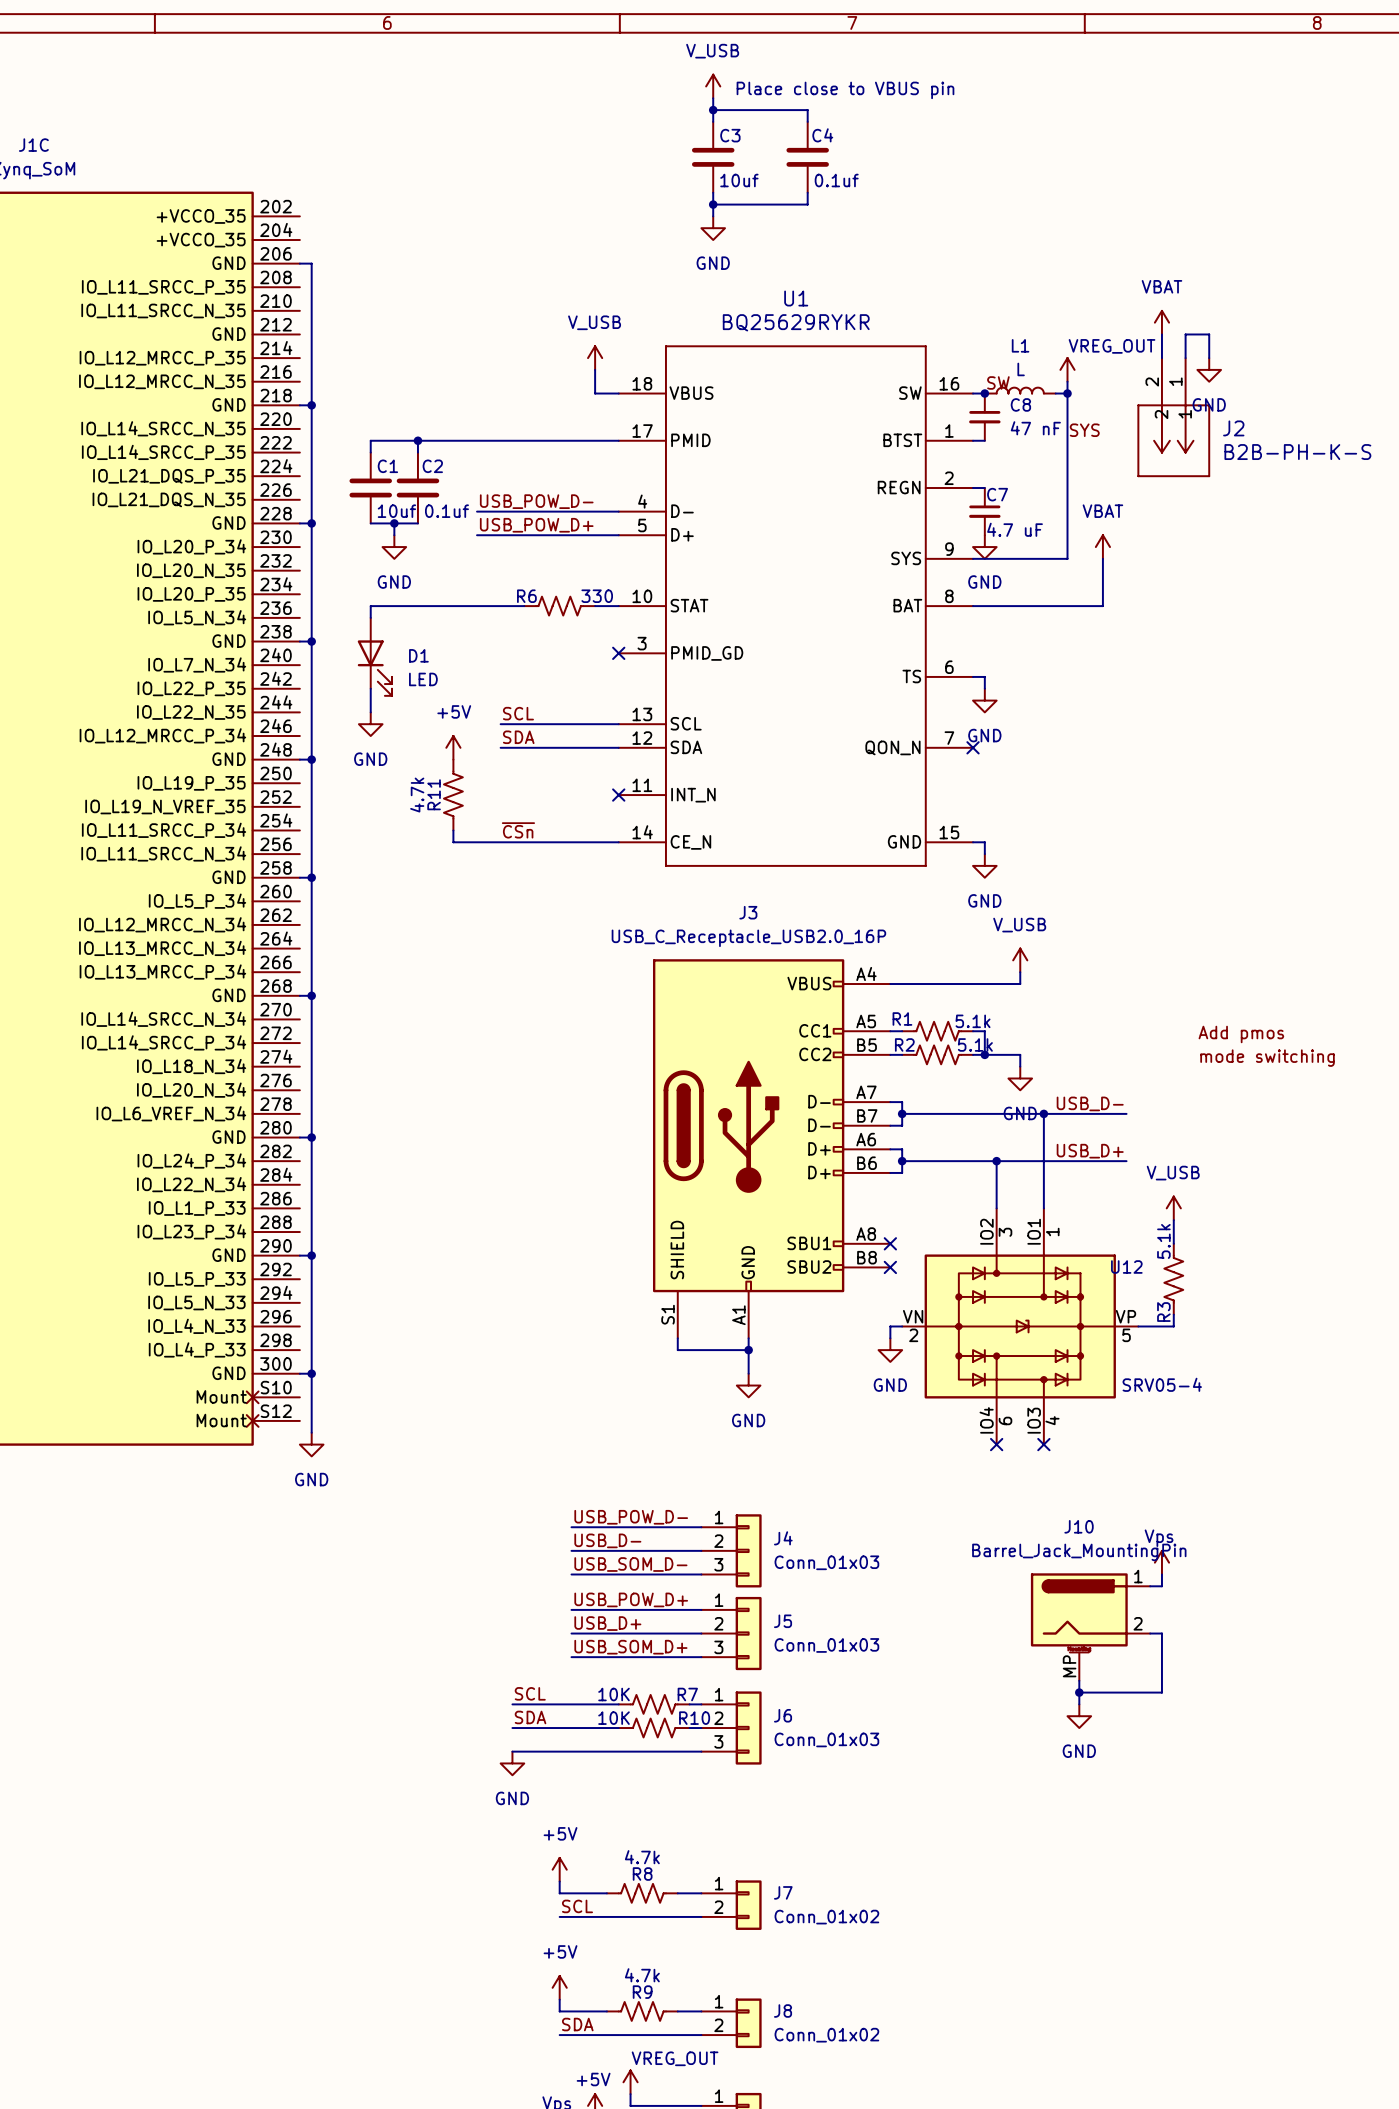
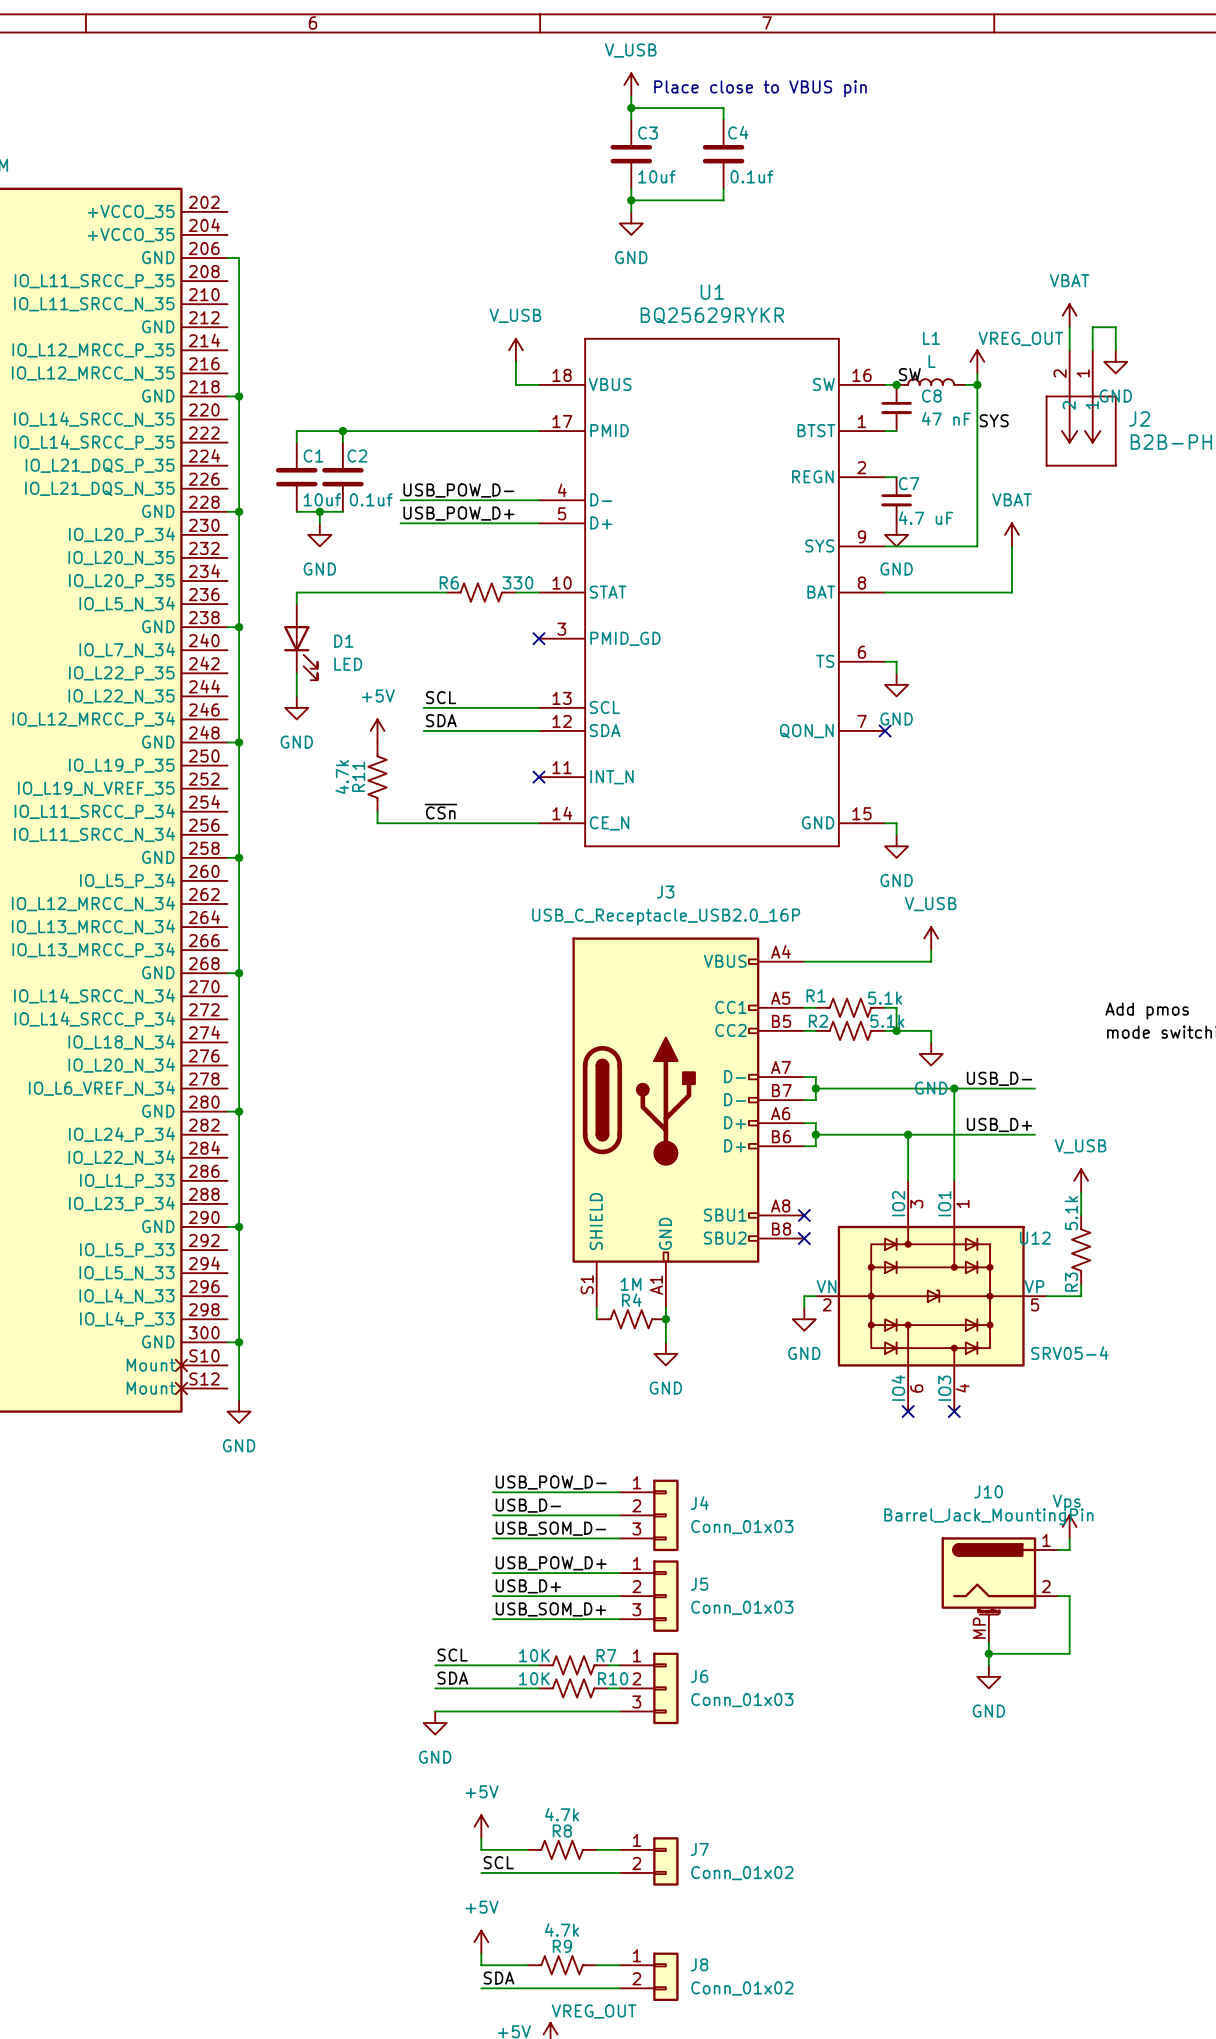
R4: none -> 1M (631, 1319)

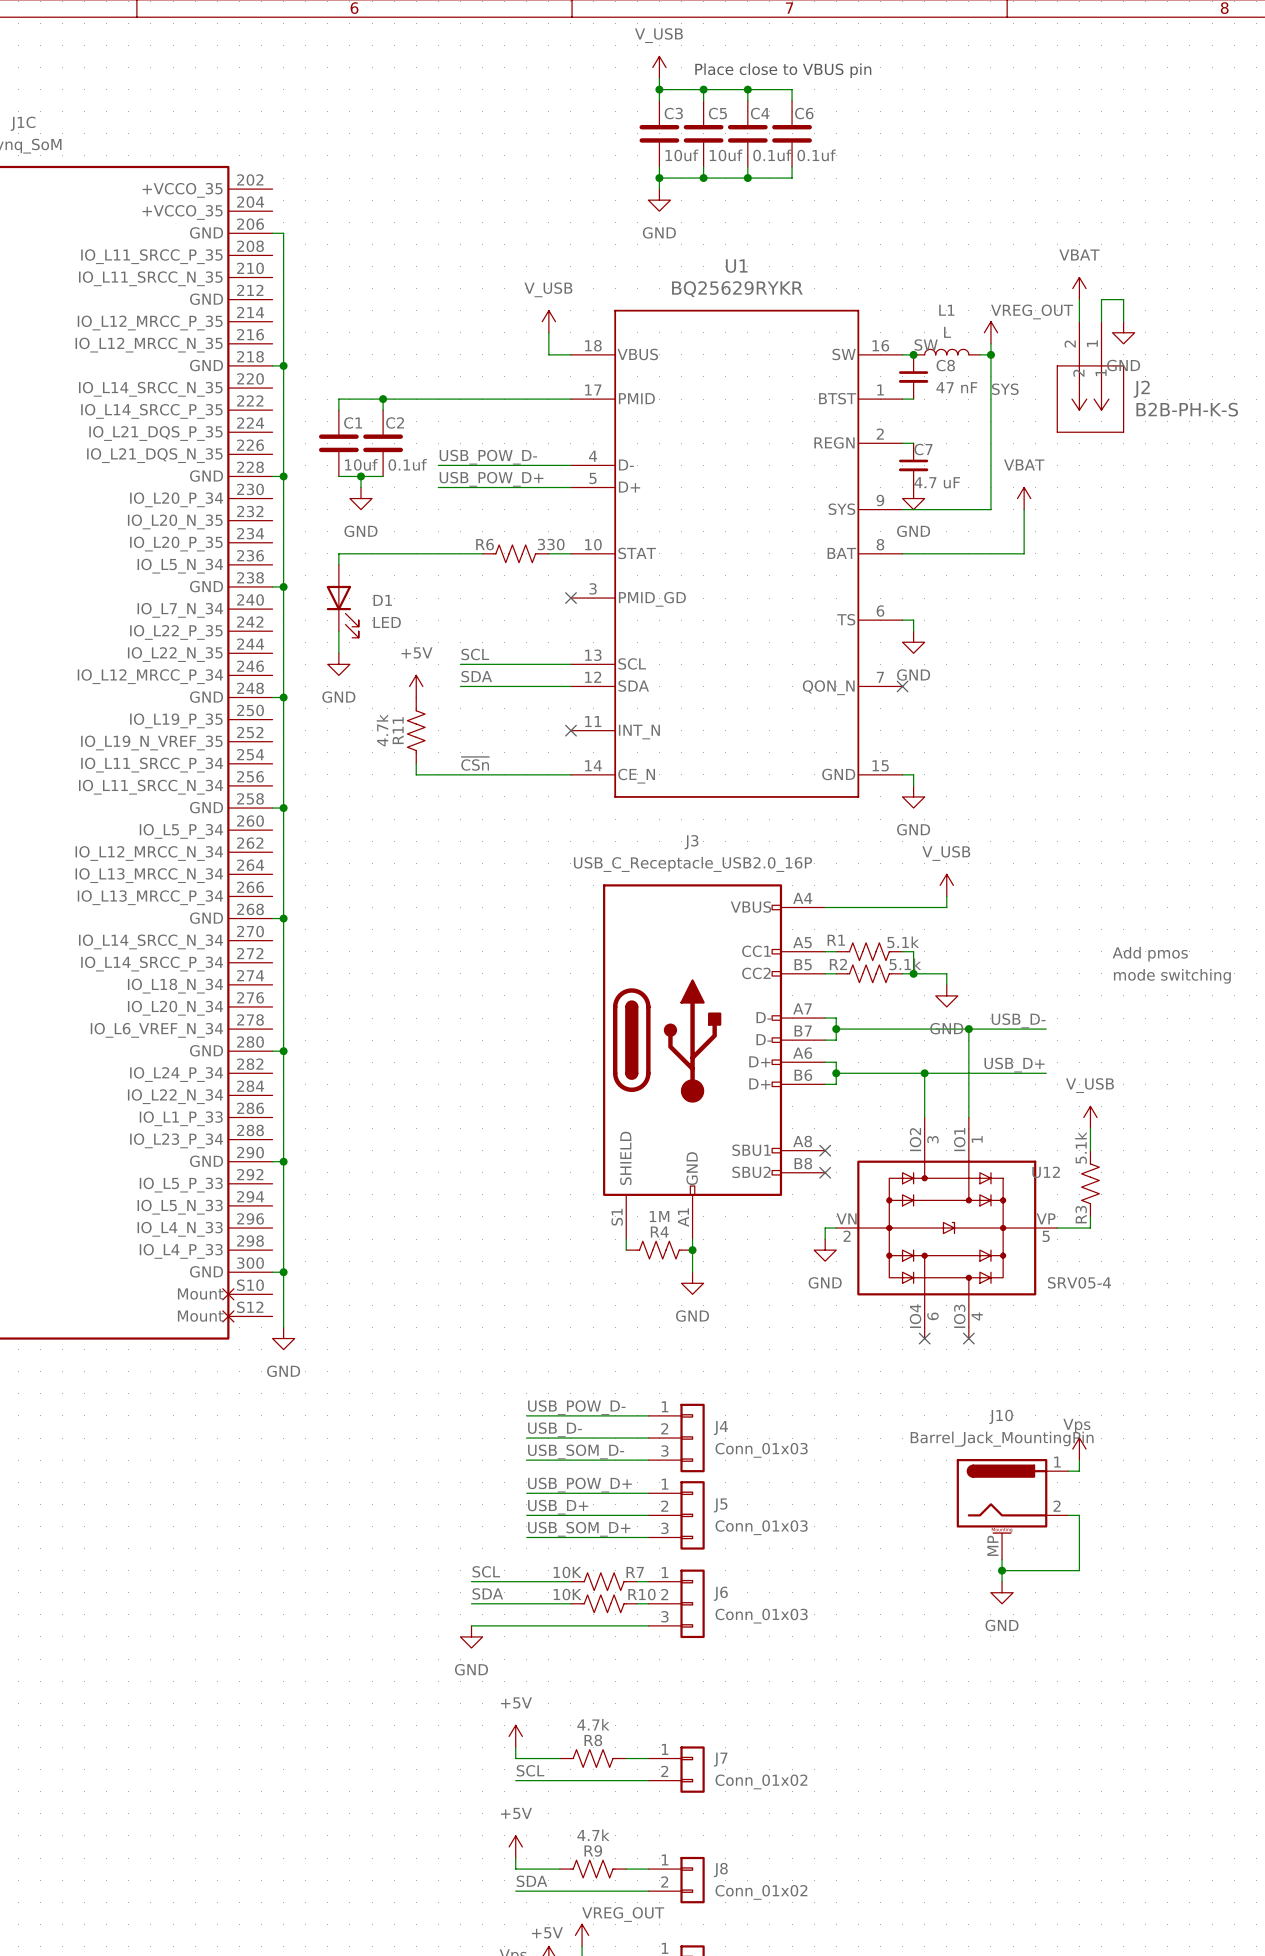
wire: none -> (703, 89) (703, 100)
junction: none -> (703, 89)
wire: none -> (747, 89) (792, 89) (792, 100)
junction: none -> (747, 89)
C5: none -> 10uf (703, 133)
C6: none -> 0.1uf (792, 133)
wire: none -> (703, 166) (703, 178)
wire: none -> (792, 166) (792, 178) (747, 178)
junction: none -> (703, 178)
junction: none -> (747, 178)

